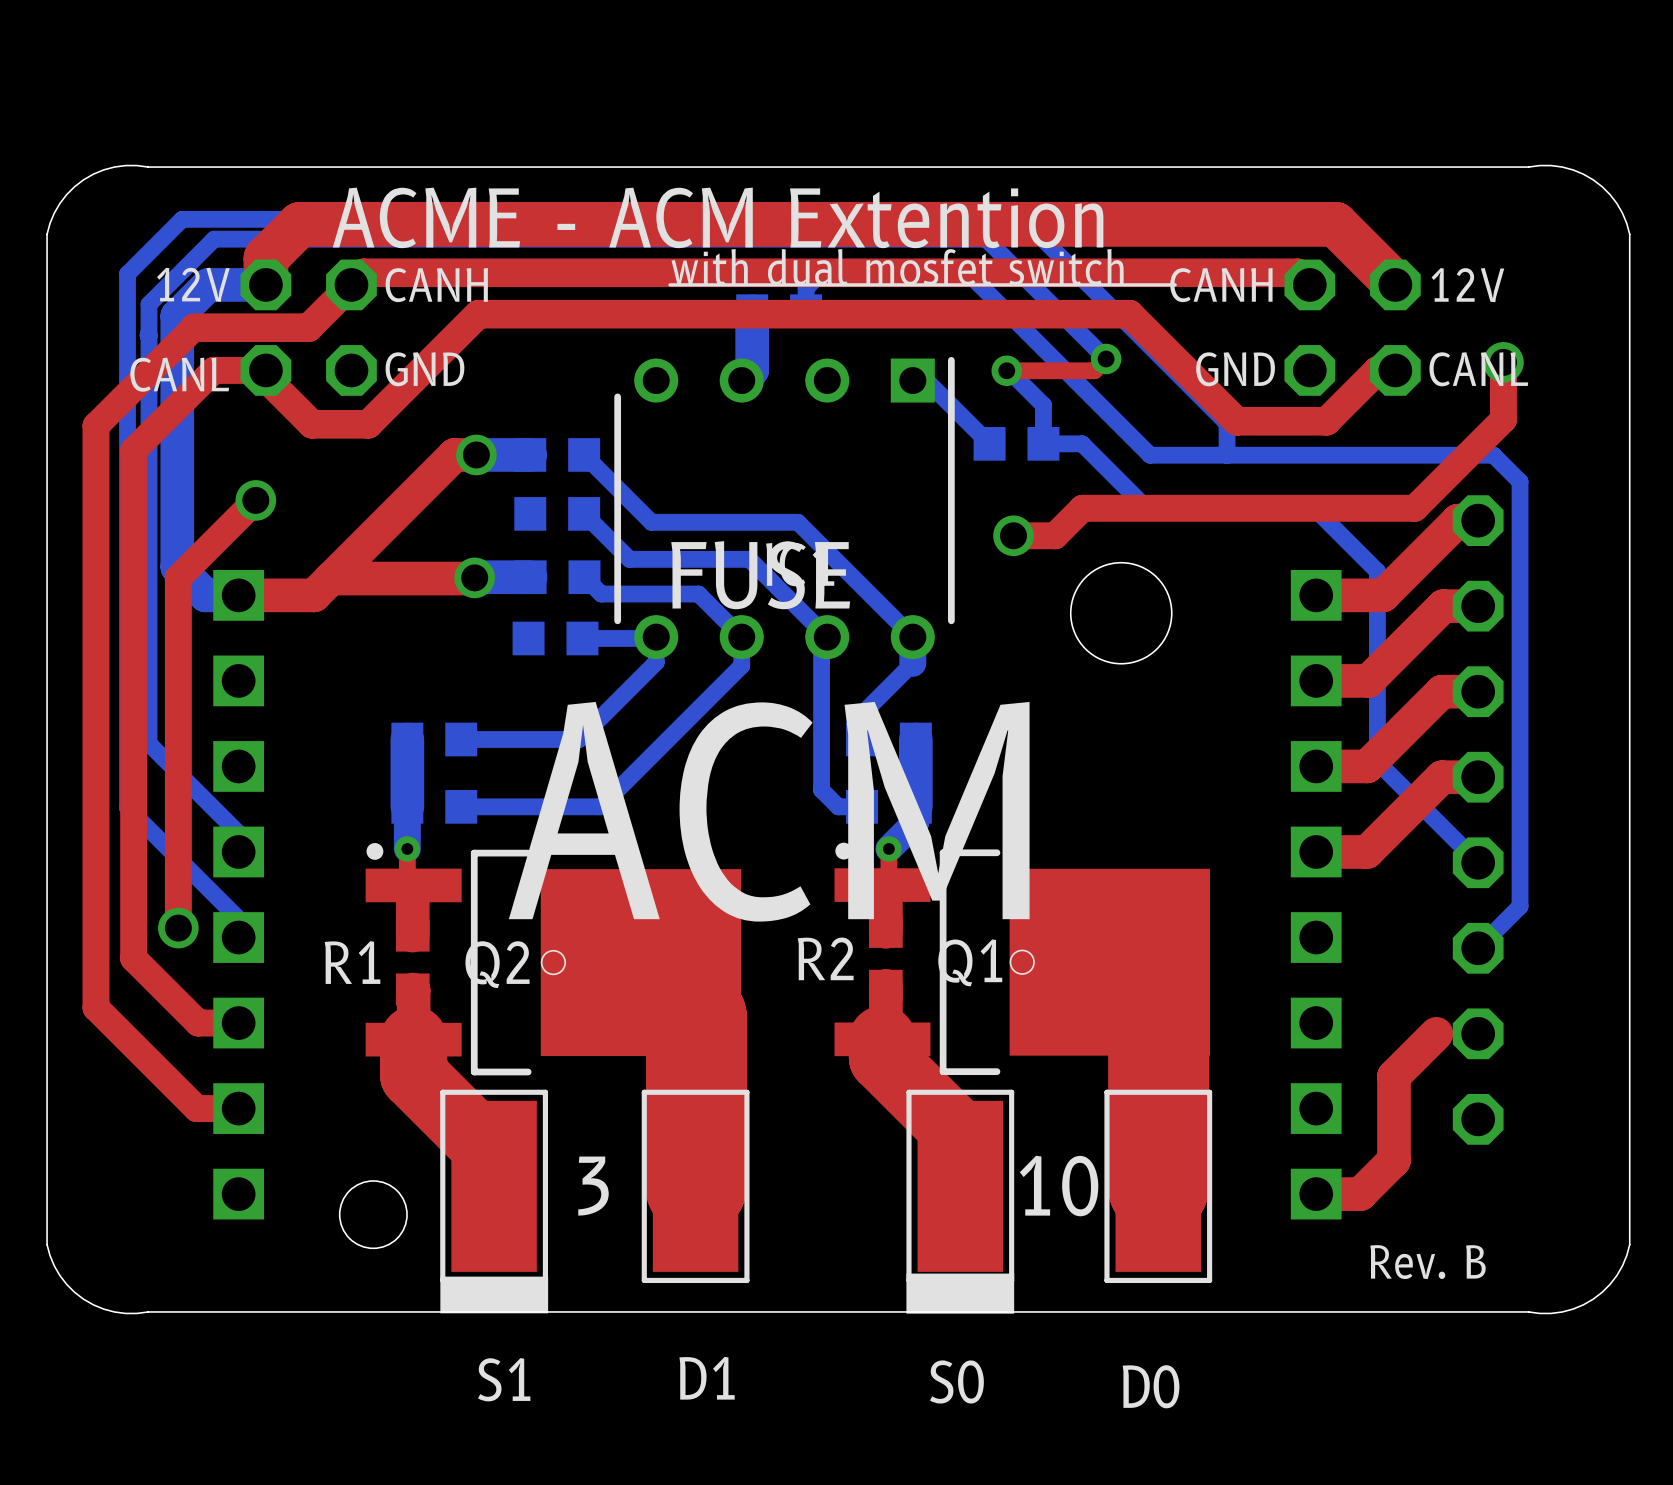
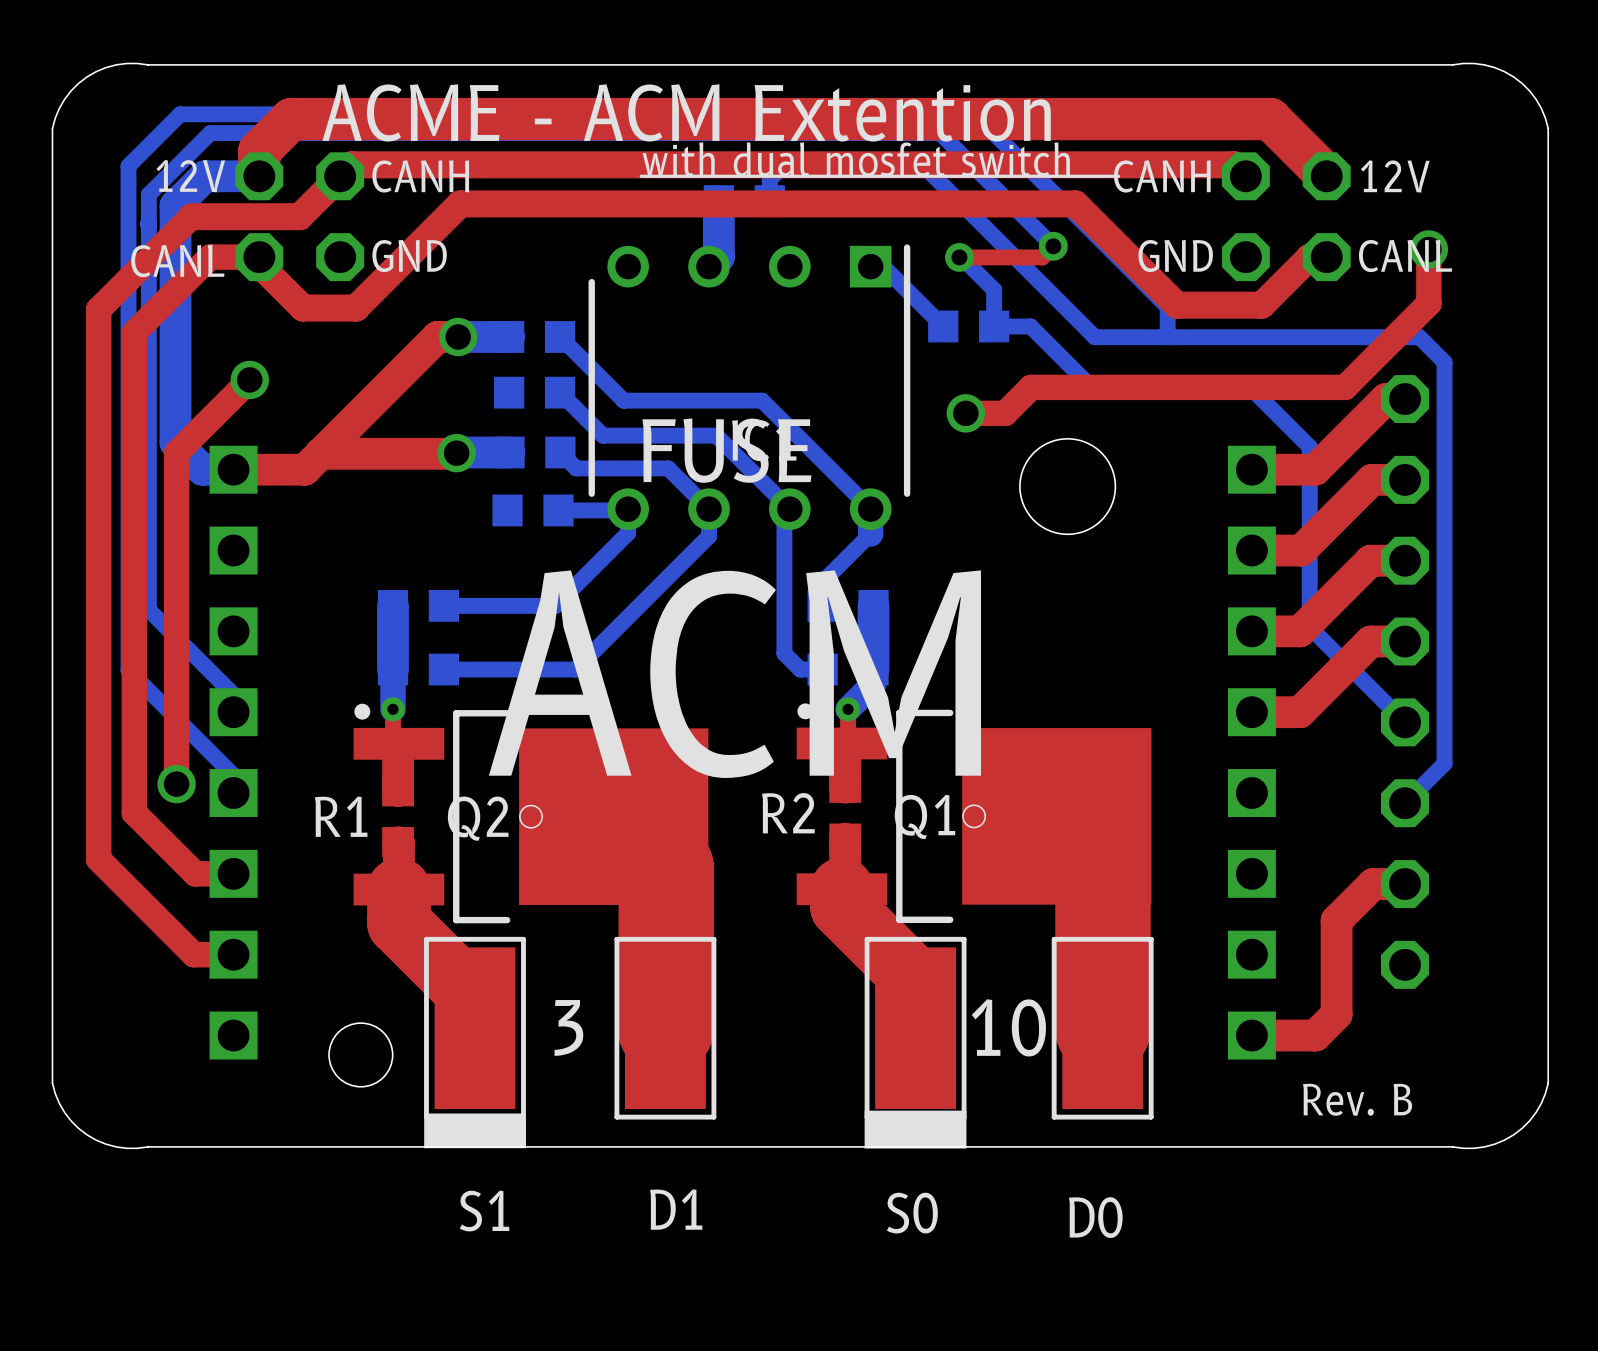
top track: (1436, 1033) (1394, 1076) (1394, 1160) (1360, 1194) -> (1405, 884) (1373, 884) (1336, 920) (1336, 1014) (1315, 1035) (1293, 1035)

